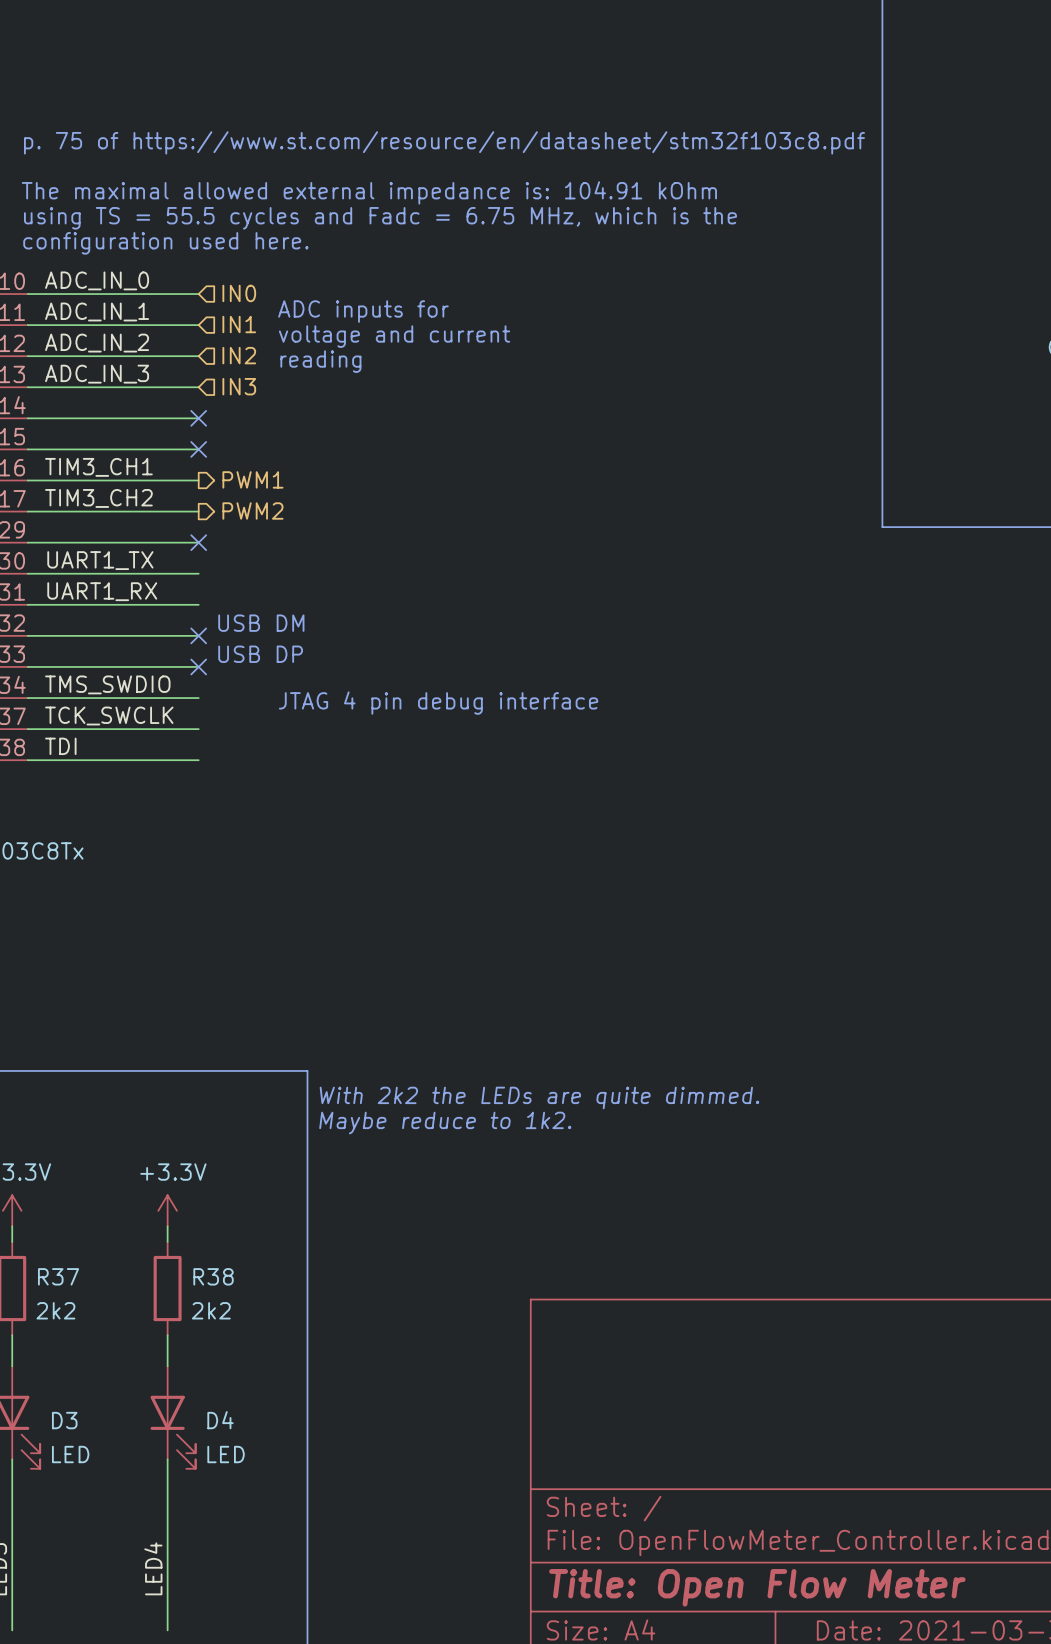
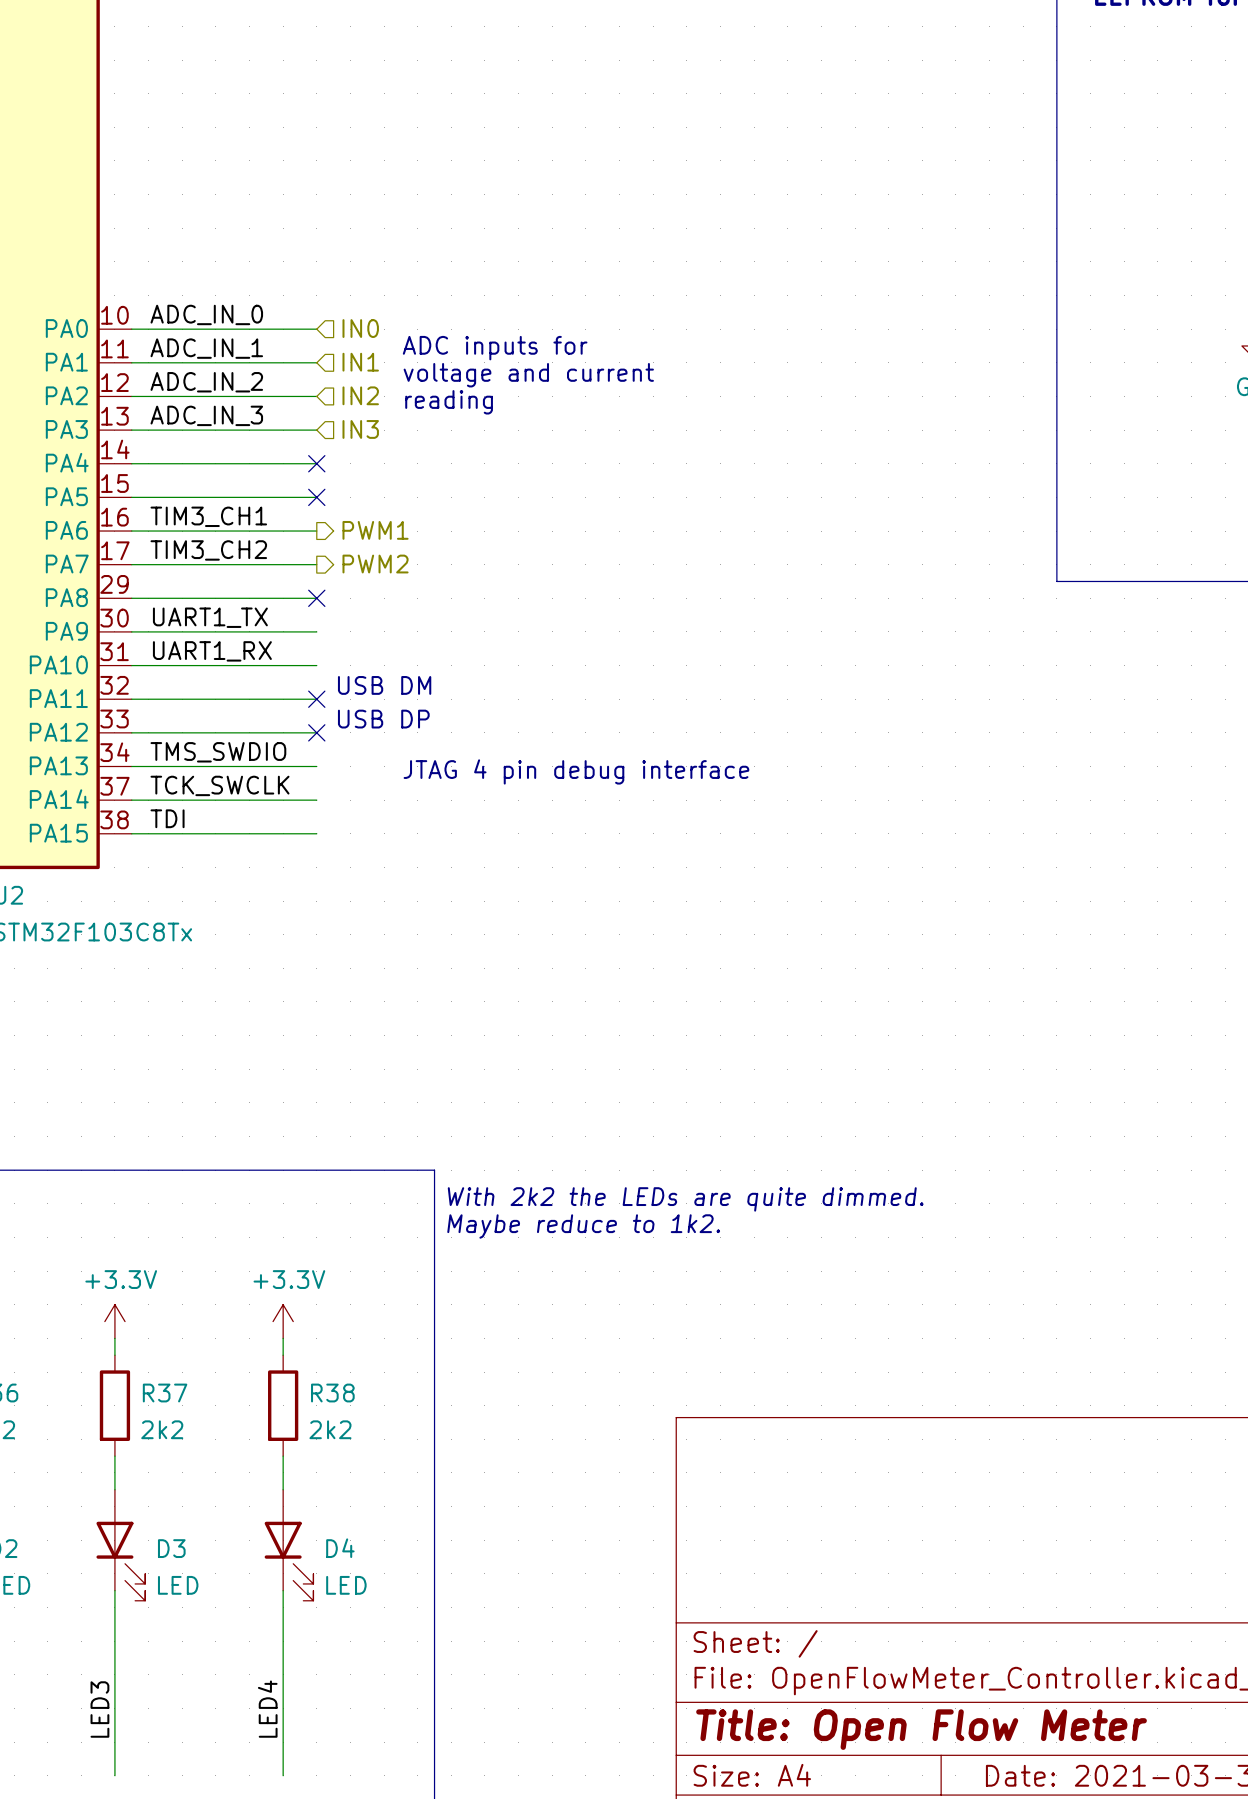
text: p. 75 of https://www.st.com/resource/en/datasheet/stm32f103c8.pdf (444, 142) -> none
text: The maximal allowed external impedance is: 104.91 kOhm (369, 192) -> none
text: using TS = 55.5 cycles and Fadc = 6.75 MHz, which is the (380, 218) -> none
text: configuration used here. (165, 243) -> none

